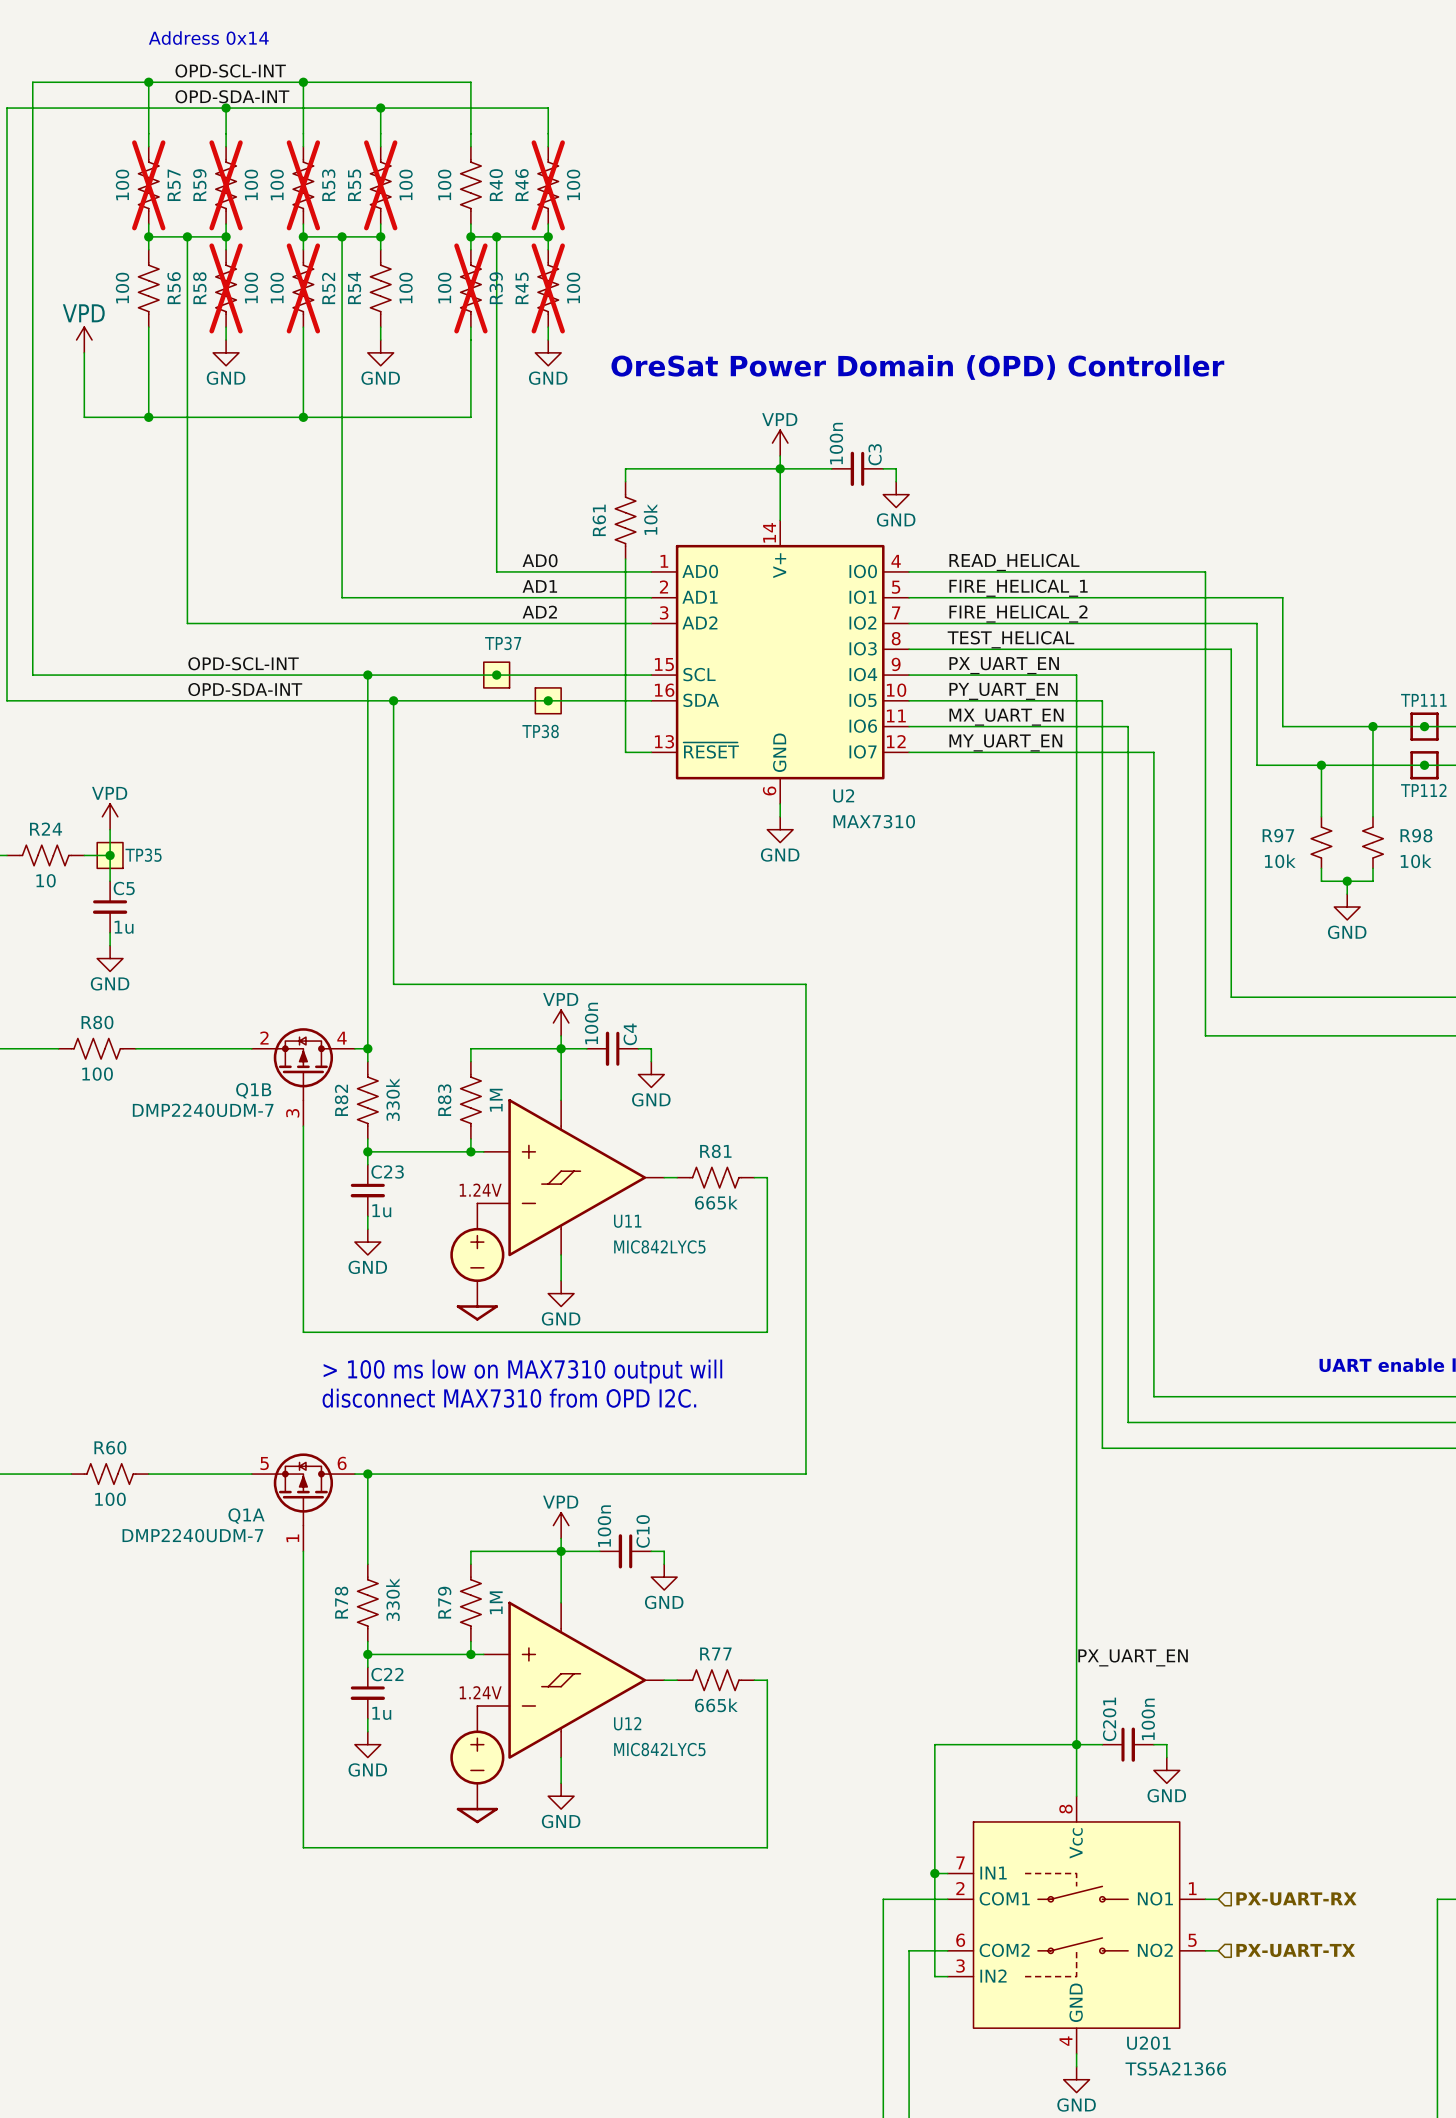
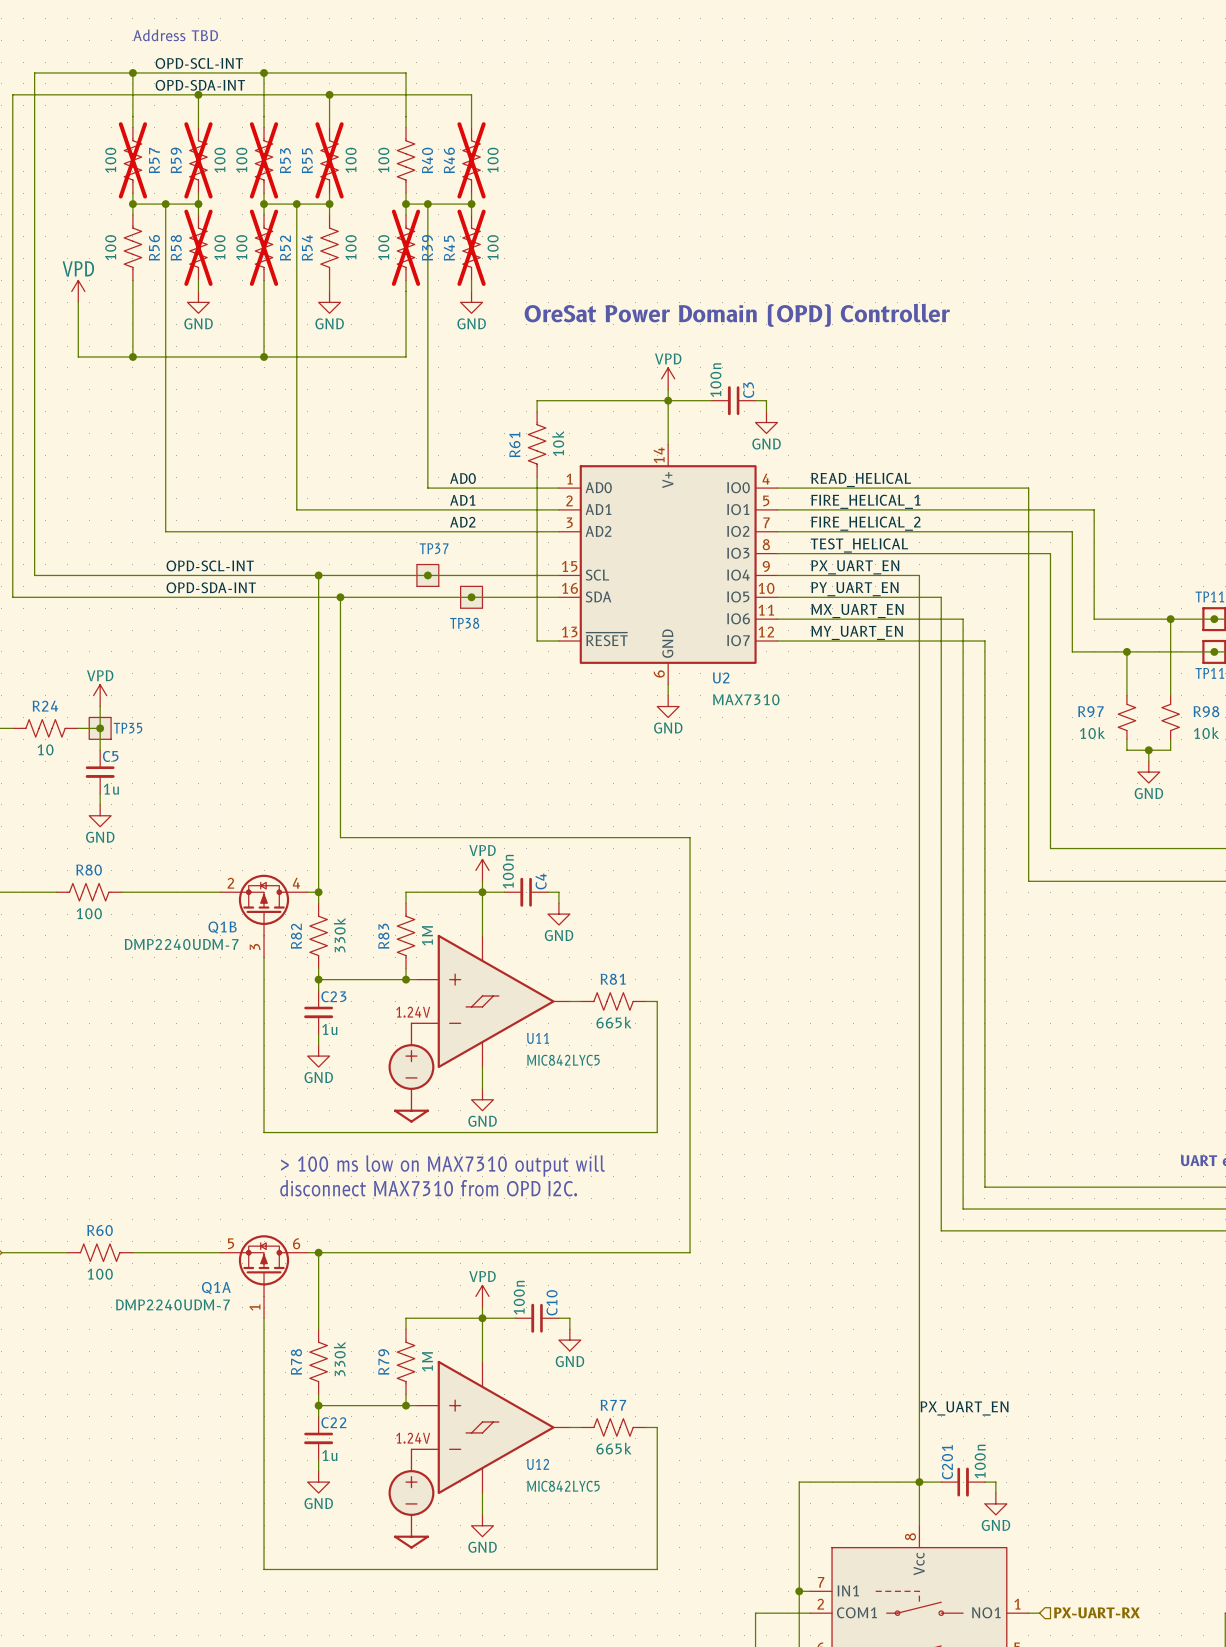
text: Address 0x14 (208, 38) -> Address TBD (175, 35)

